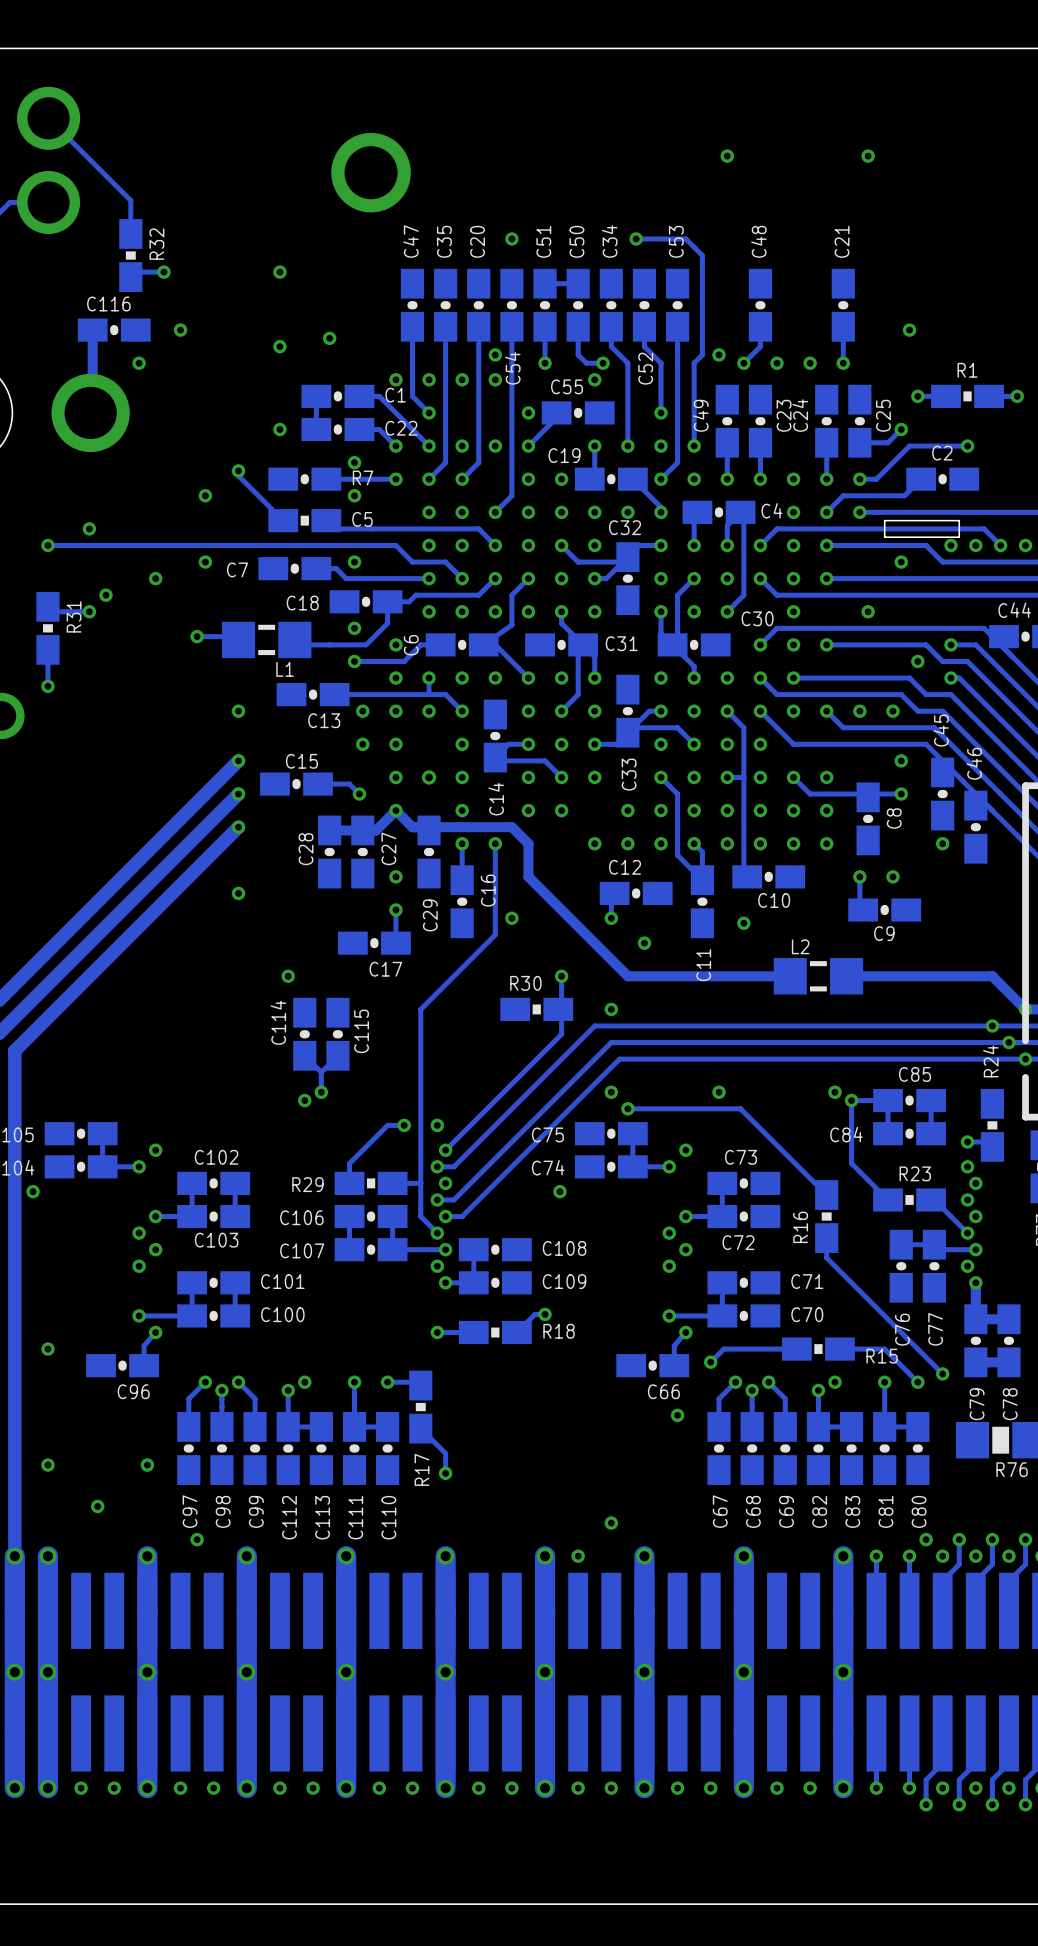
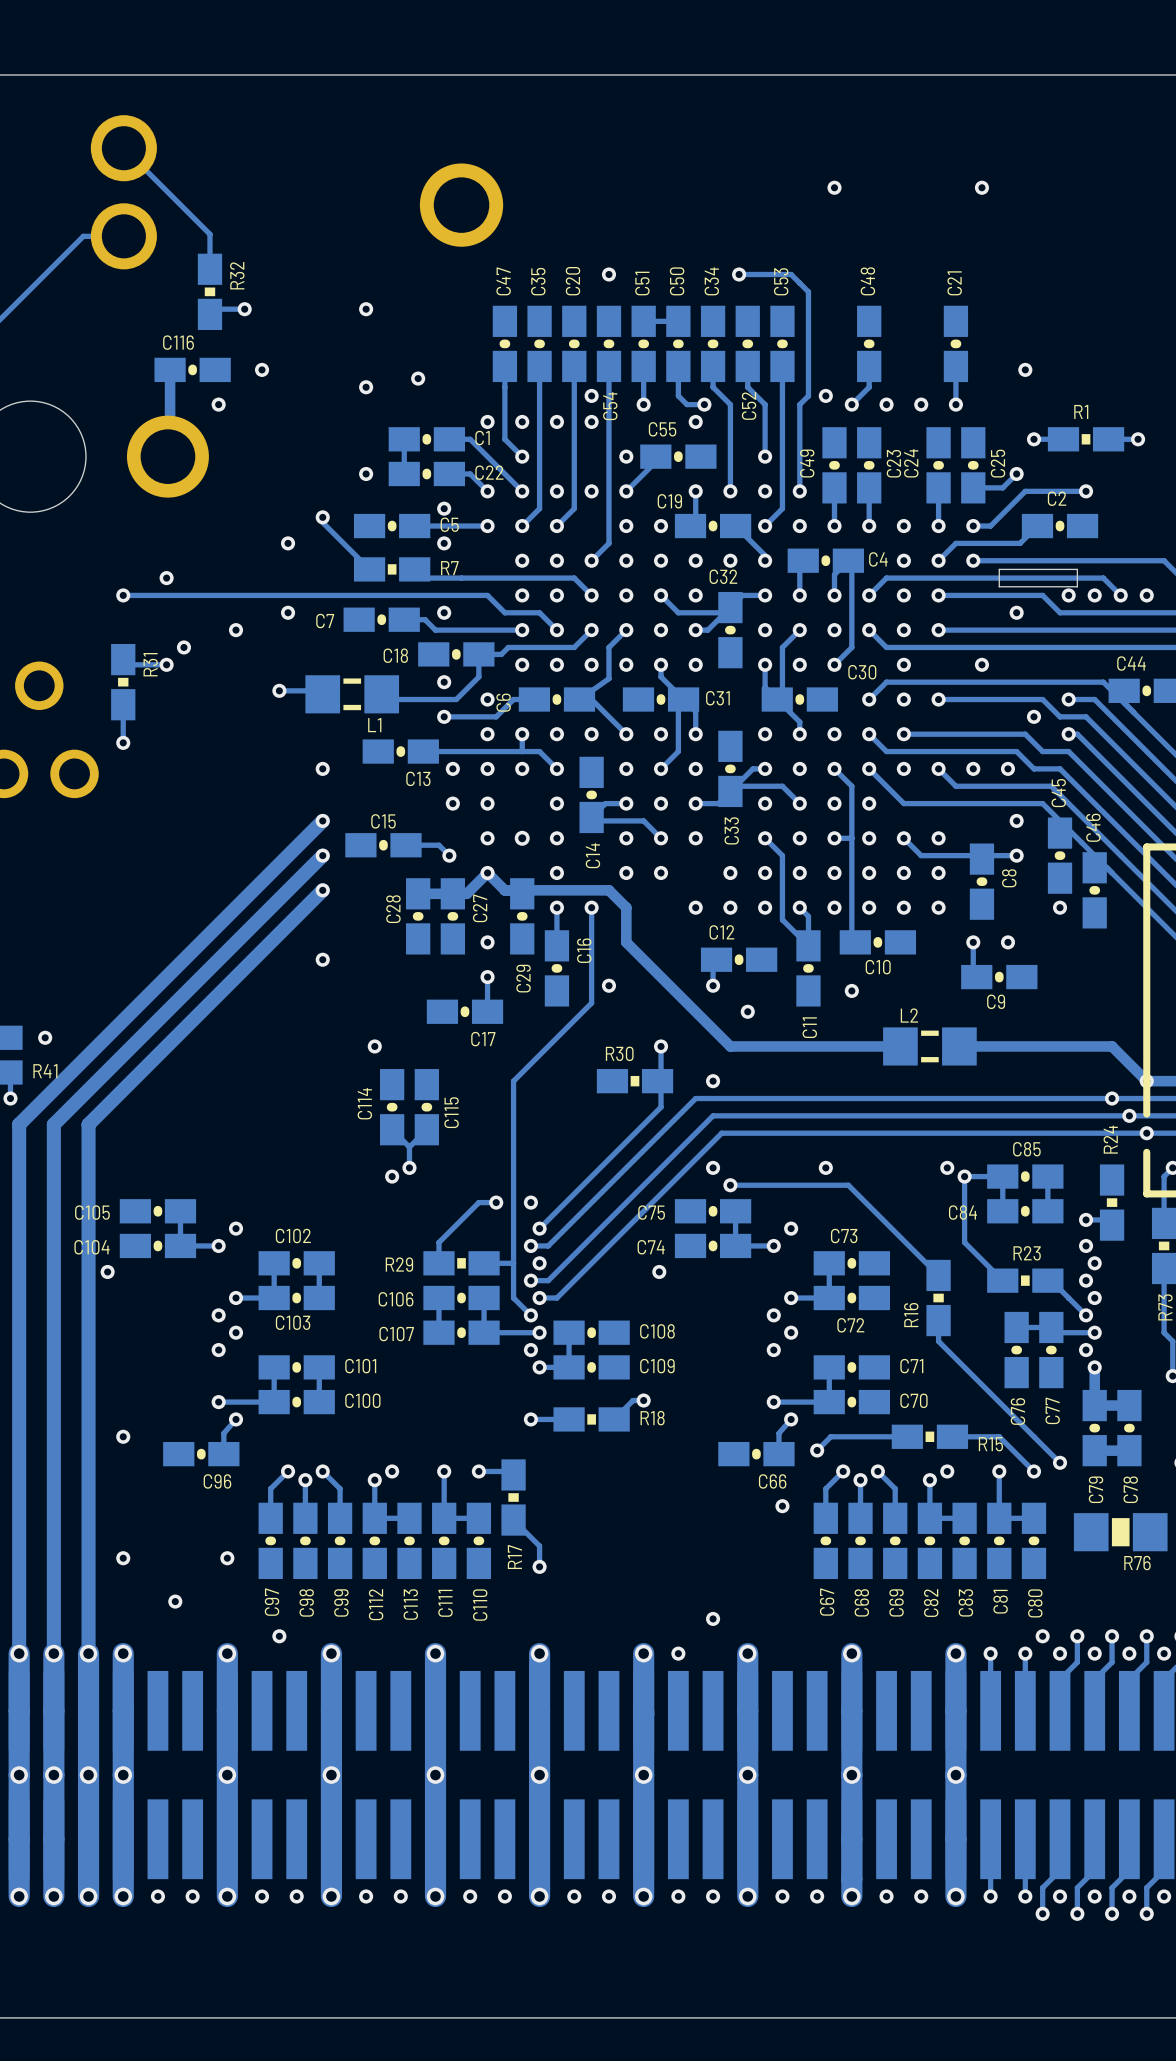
R7 name position: R7 (363, 477) -> R7 (449, 568)
C5 name position: C5 (362, 519) -> C5 (449, 524)

